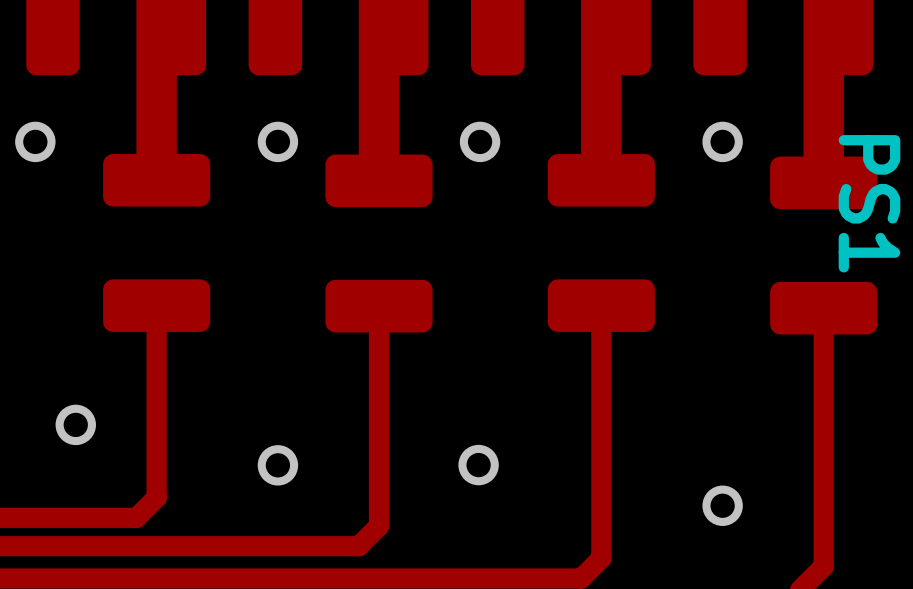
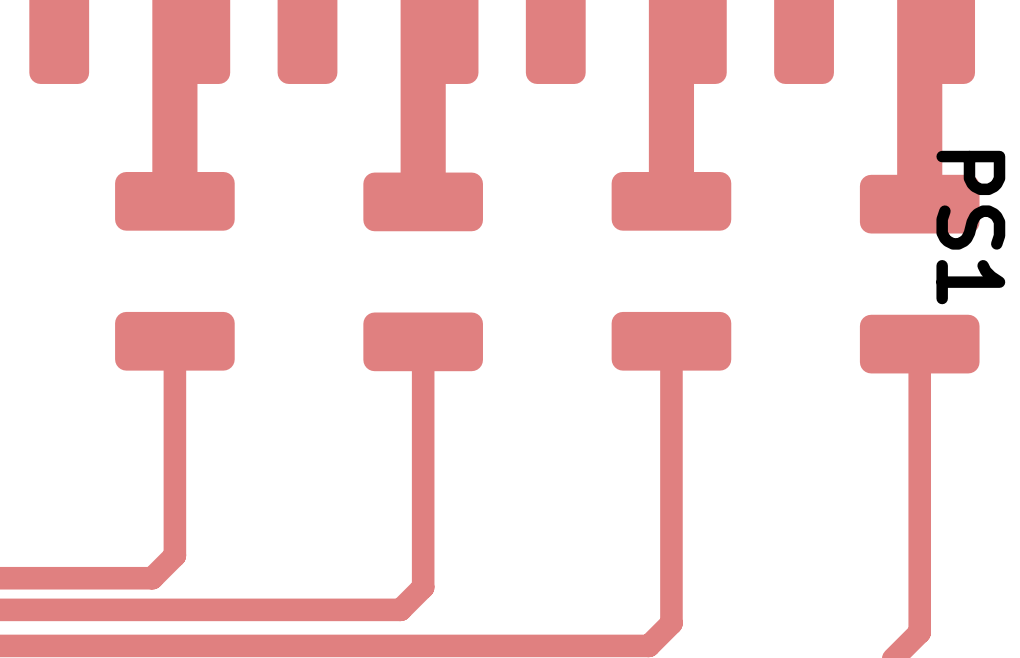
via: (35, 141) -> none
via: (277, 141) -> none
via: (480, 141) -> none
via: (722, 141) -> none
via: (75, 424) -> none
via: (277, 465) -> none
via: (478, 465) -> none
via: (722, 505) -> none

